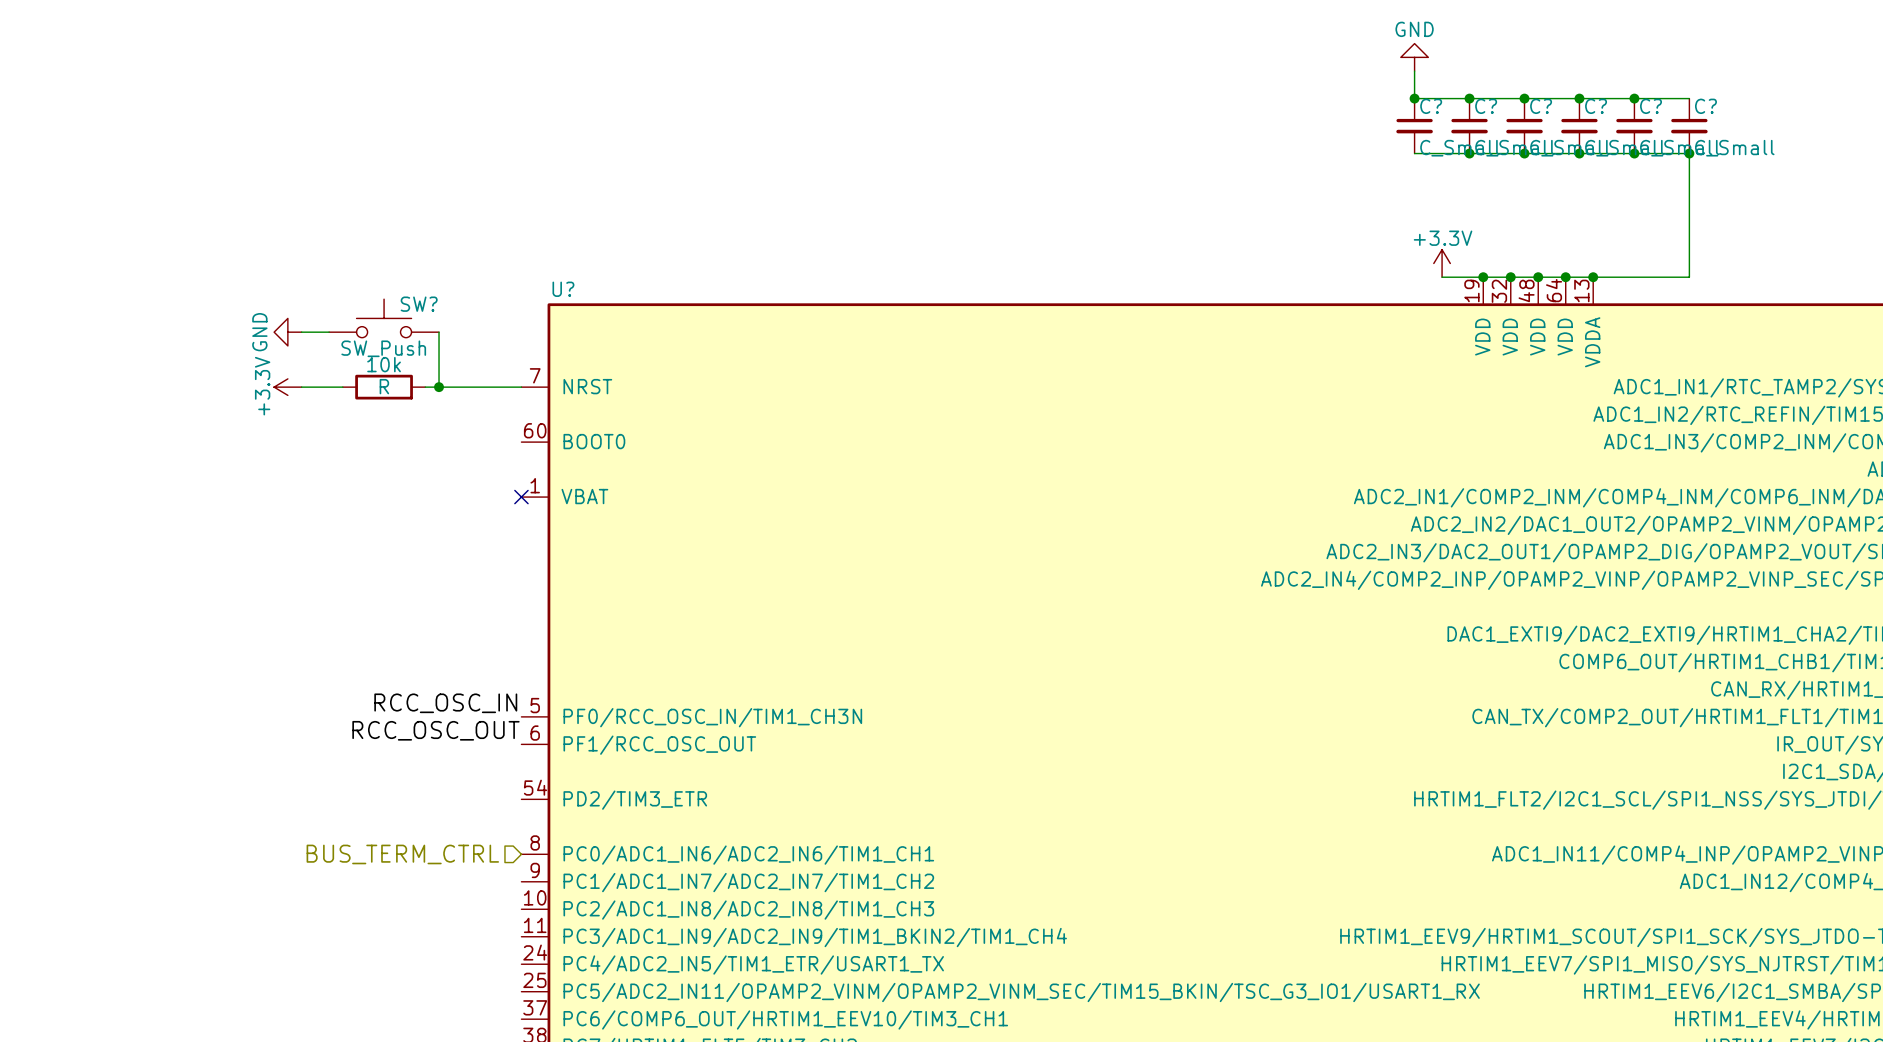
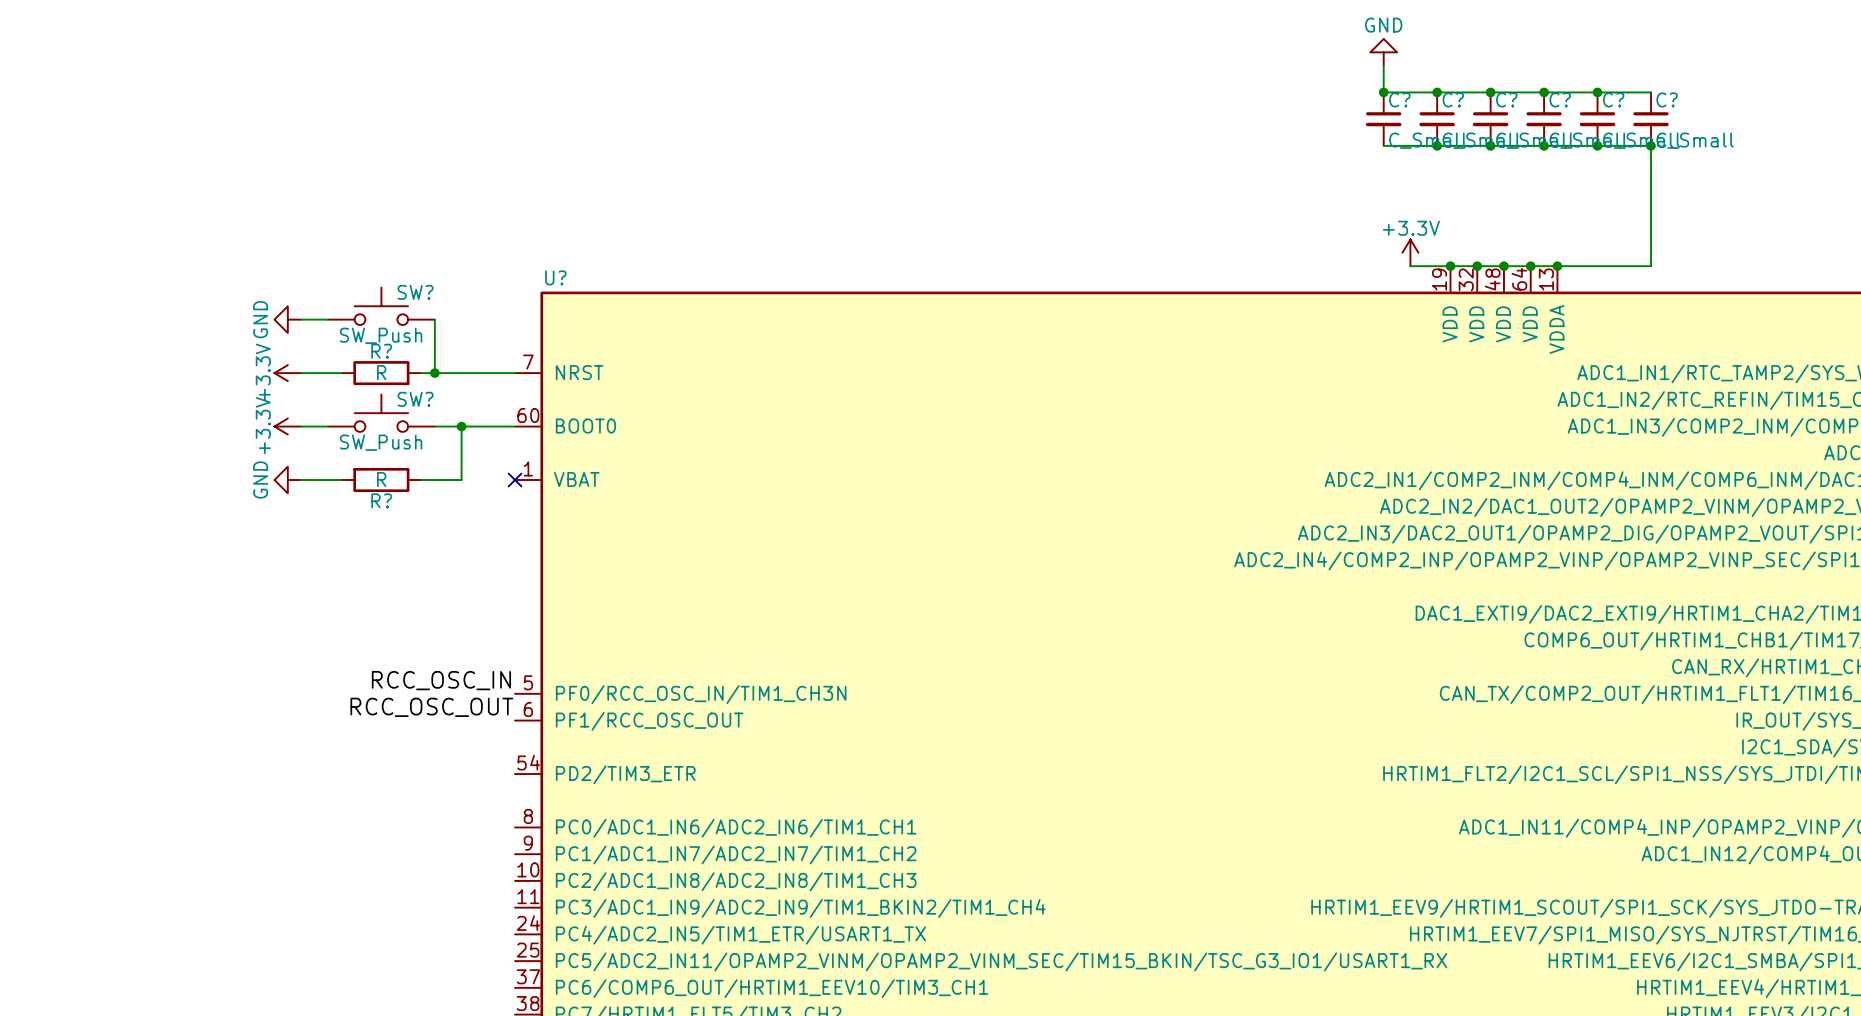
10k name: 10k (384, 364) -> R? (381, 351)
SW?: none -> SW_Push (381, 413)
power symbol: none -> +3.3V (287, 426)
wire: none -> (301, 426) (327, 426)
wire: none -> (434, 426) (515, 426)
wire: none -> (461, 426) (461, 480) (421, 480)
junction: none -> (461, 426)
power symbol: none -> GND (287, 480)
wire: none -> (301, 480) (341, 480)
R?: none -> R (381, 480)
hierarchical label: BUS_TERM_CTRL (402, 854) -> none

